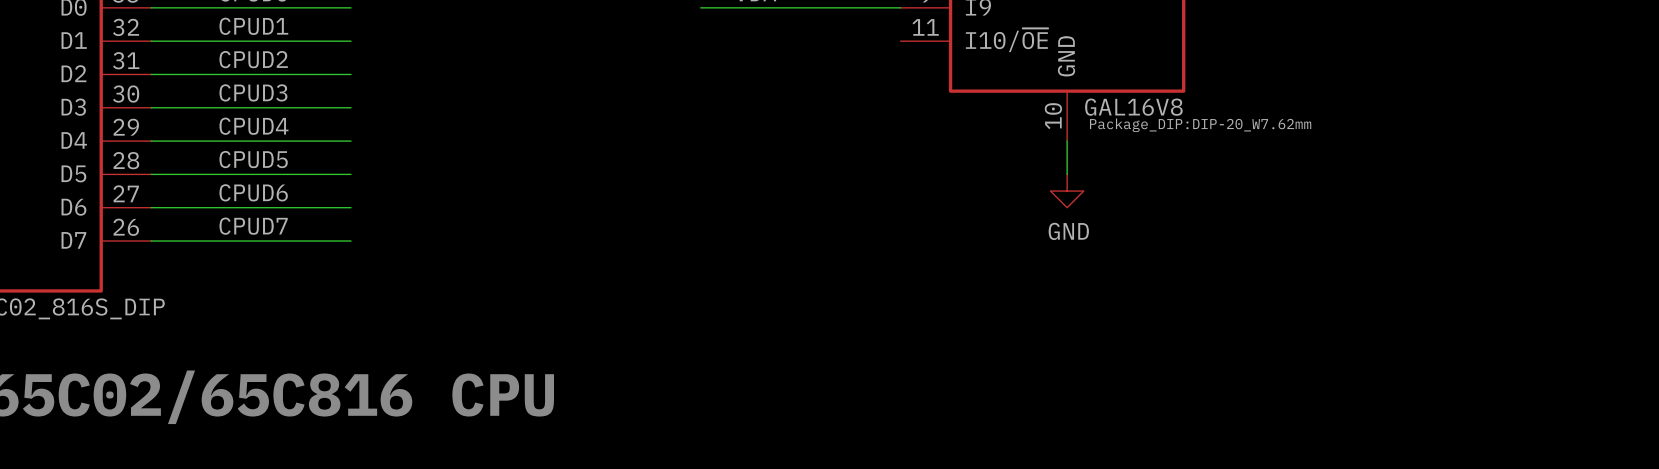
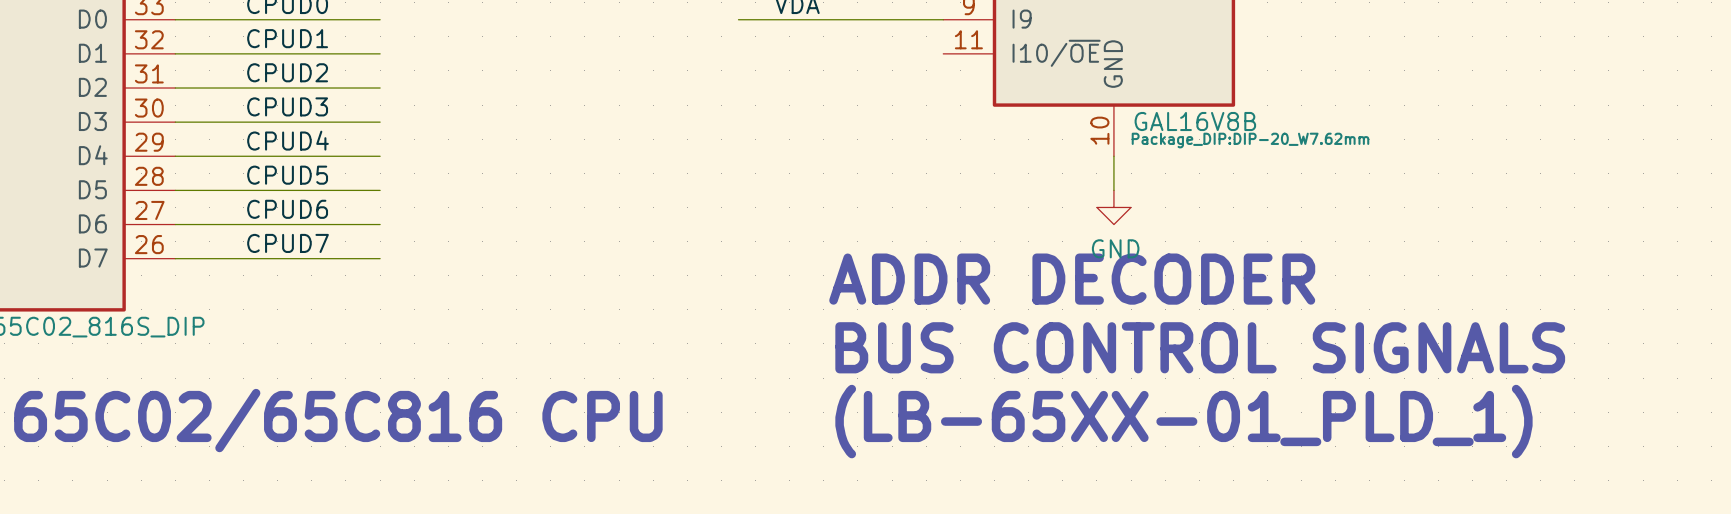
part value: GAL16V8 (1133, 107) -> GAL16V8B (1195, 121)
text: none -> ADDR DECODER (1072, 279)
text: none -> BUS CONTROL SIGNALS (1200, 347)
text: none -> (LB-65XX-01_PLD_1) (1183, 421)

